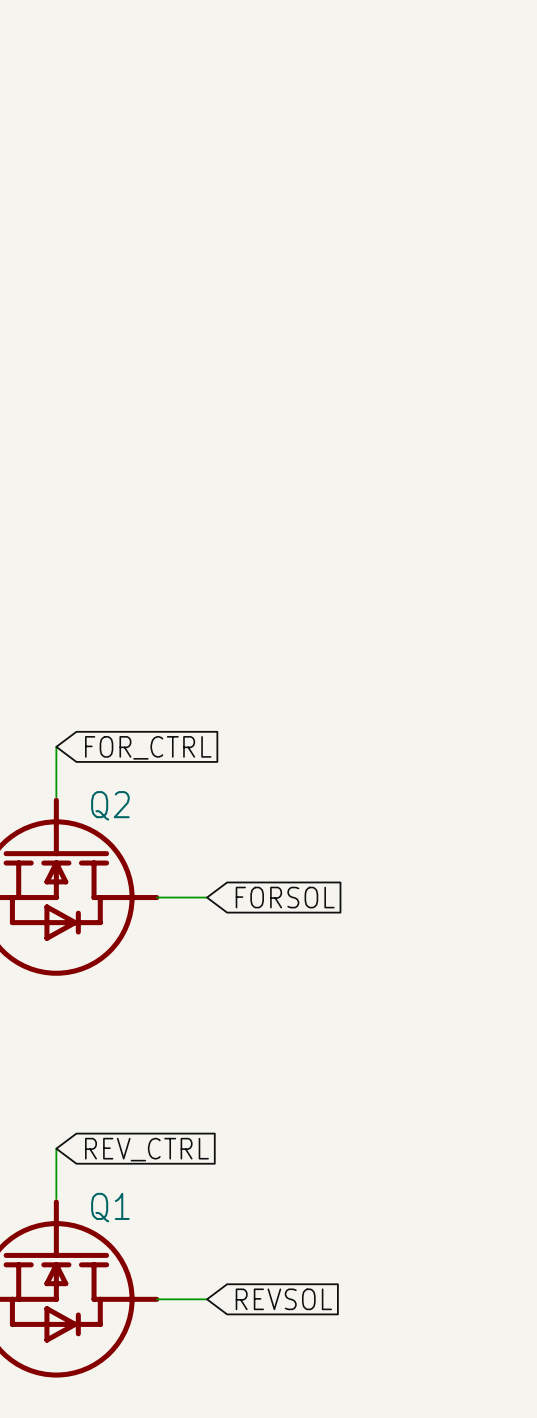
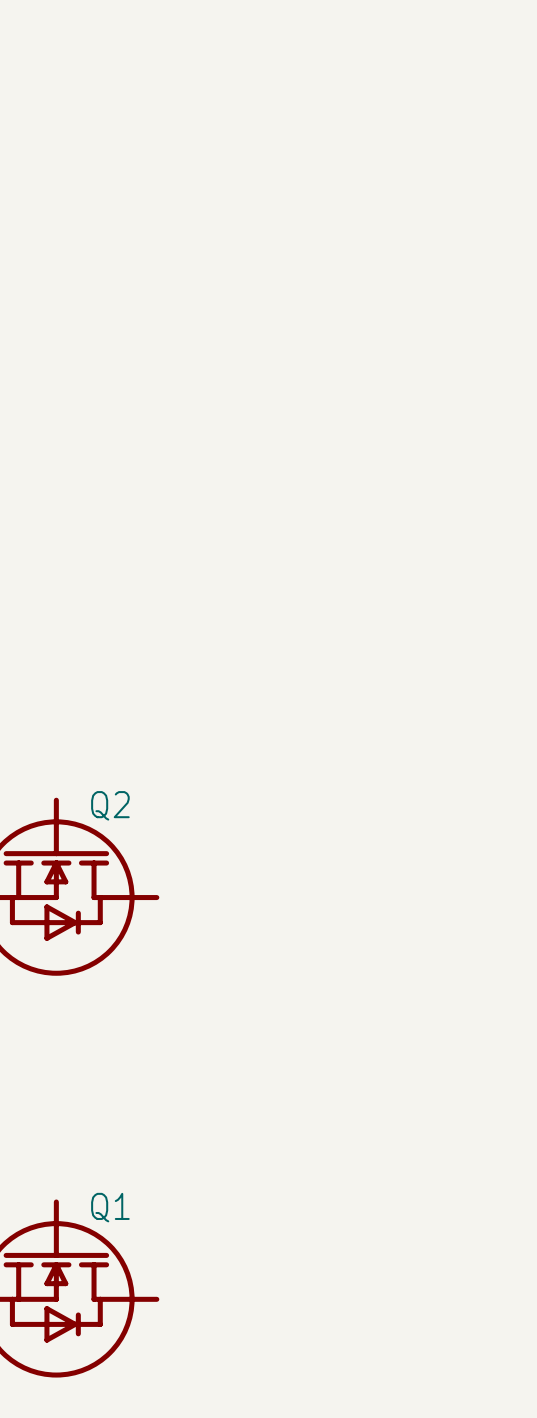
wire: (56, 746) (56, 797) -> none
global label: FOR_CTRL (148, 747) -> none
wire: (156, 897) (207, 897) -> none
global label: FORSOL (285, 897) -> none
wire: (56, 1148) (56, 1198) -> none
global label: REV_CTRL (146, 1149) -> none
wire: (156, 1299) (207, 1299) -> none
global label: REVSOL (283, 1299) -> none

